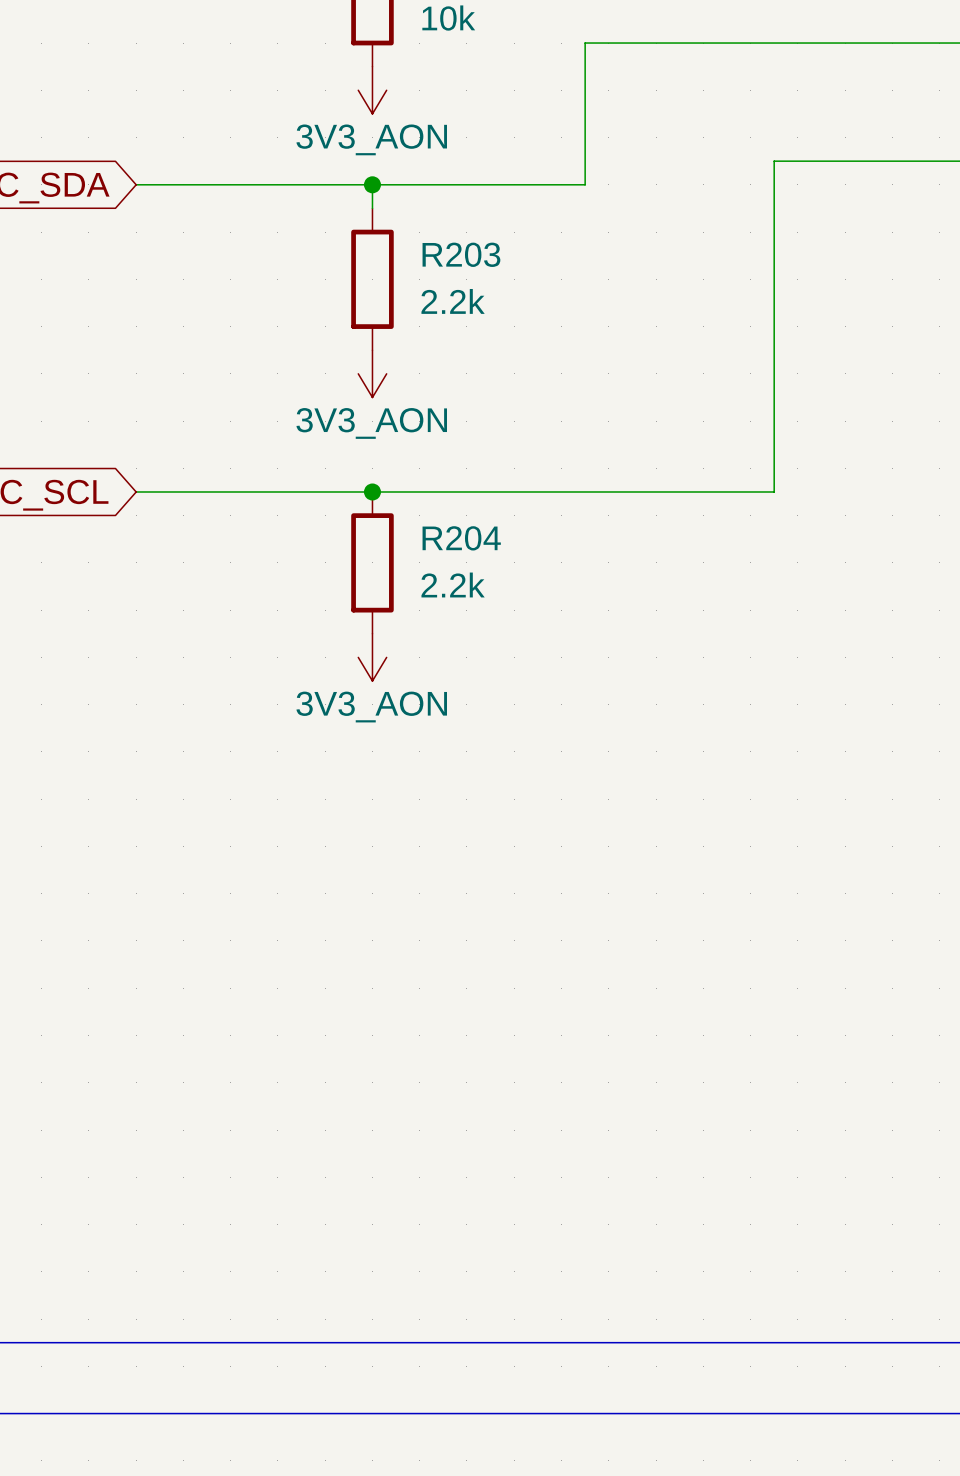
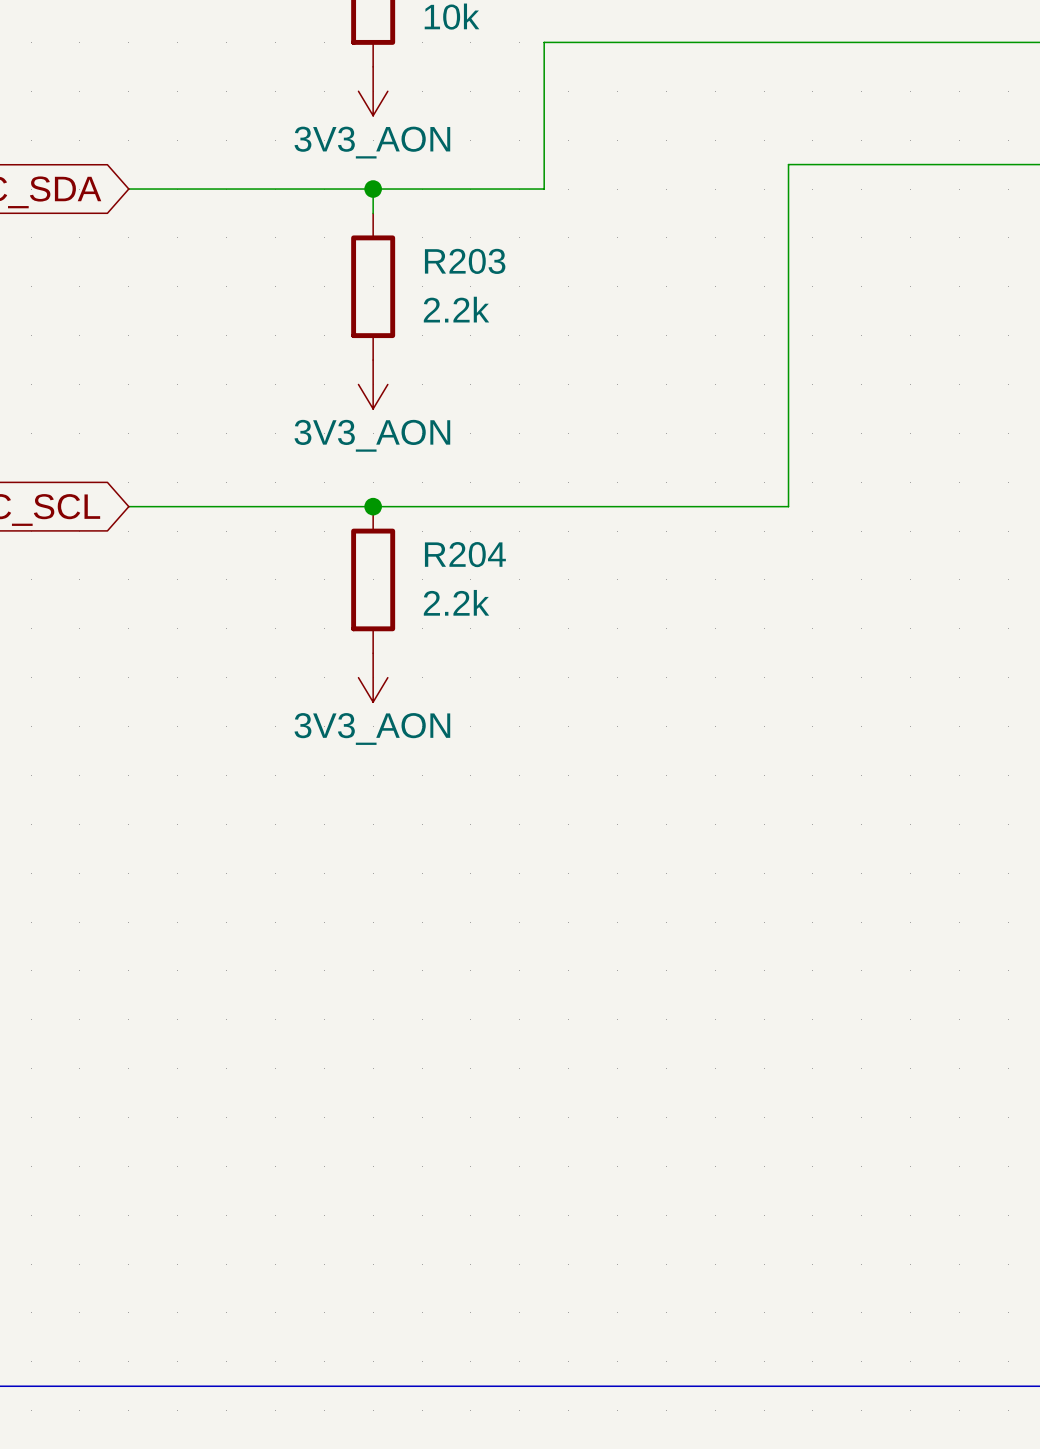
wire: (585, 43) (585, 184) (537, 184) -> (593, 42) (544, 42) (544, 189)

